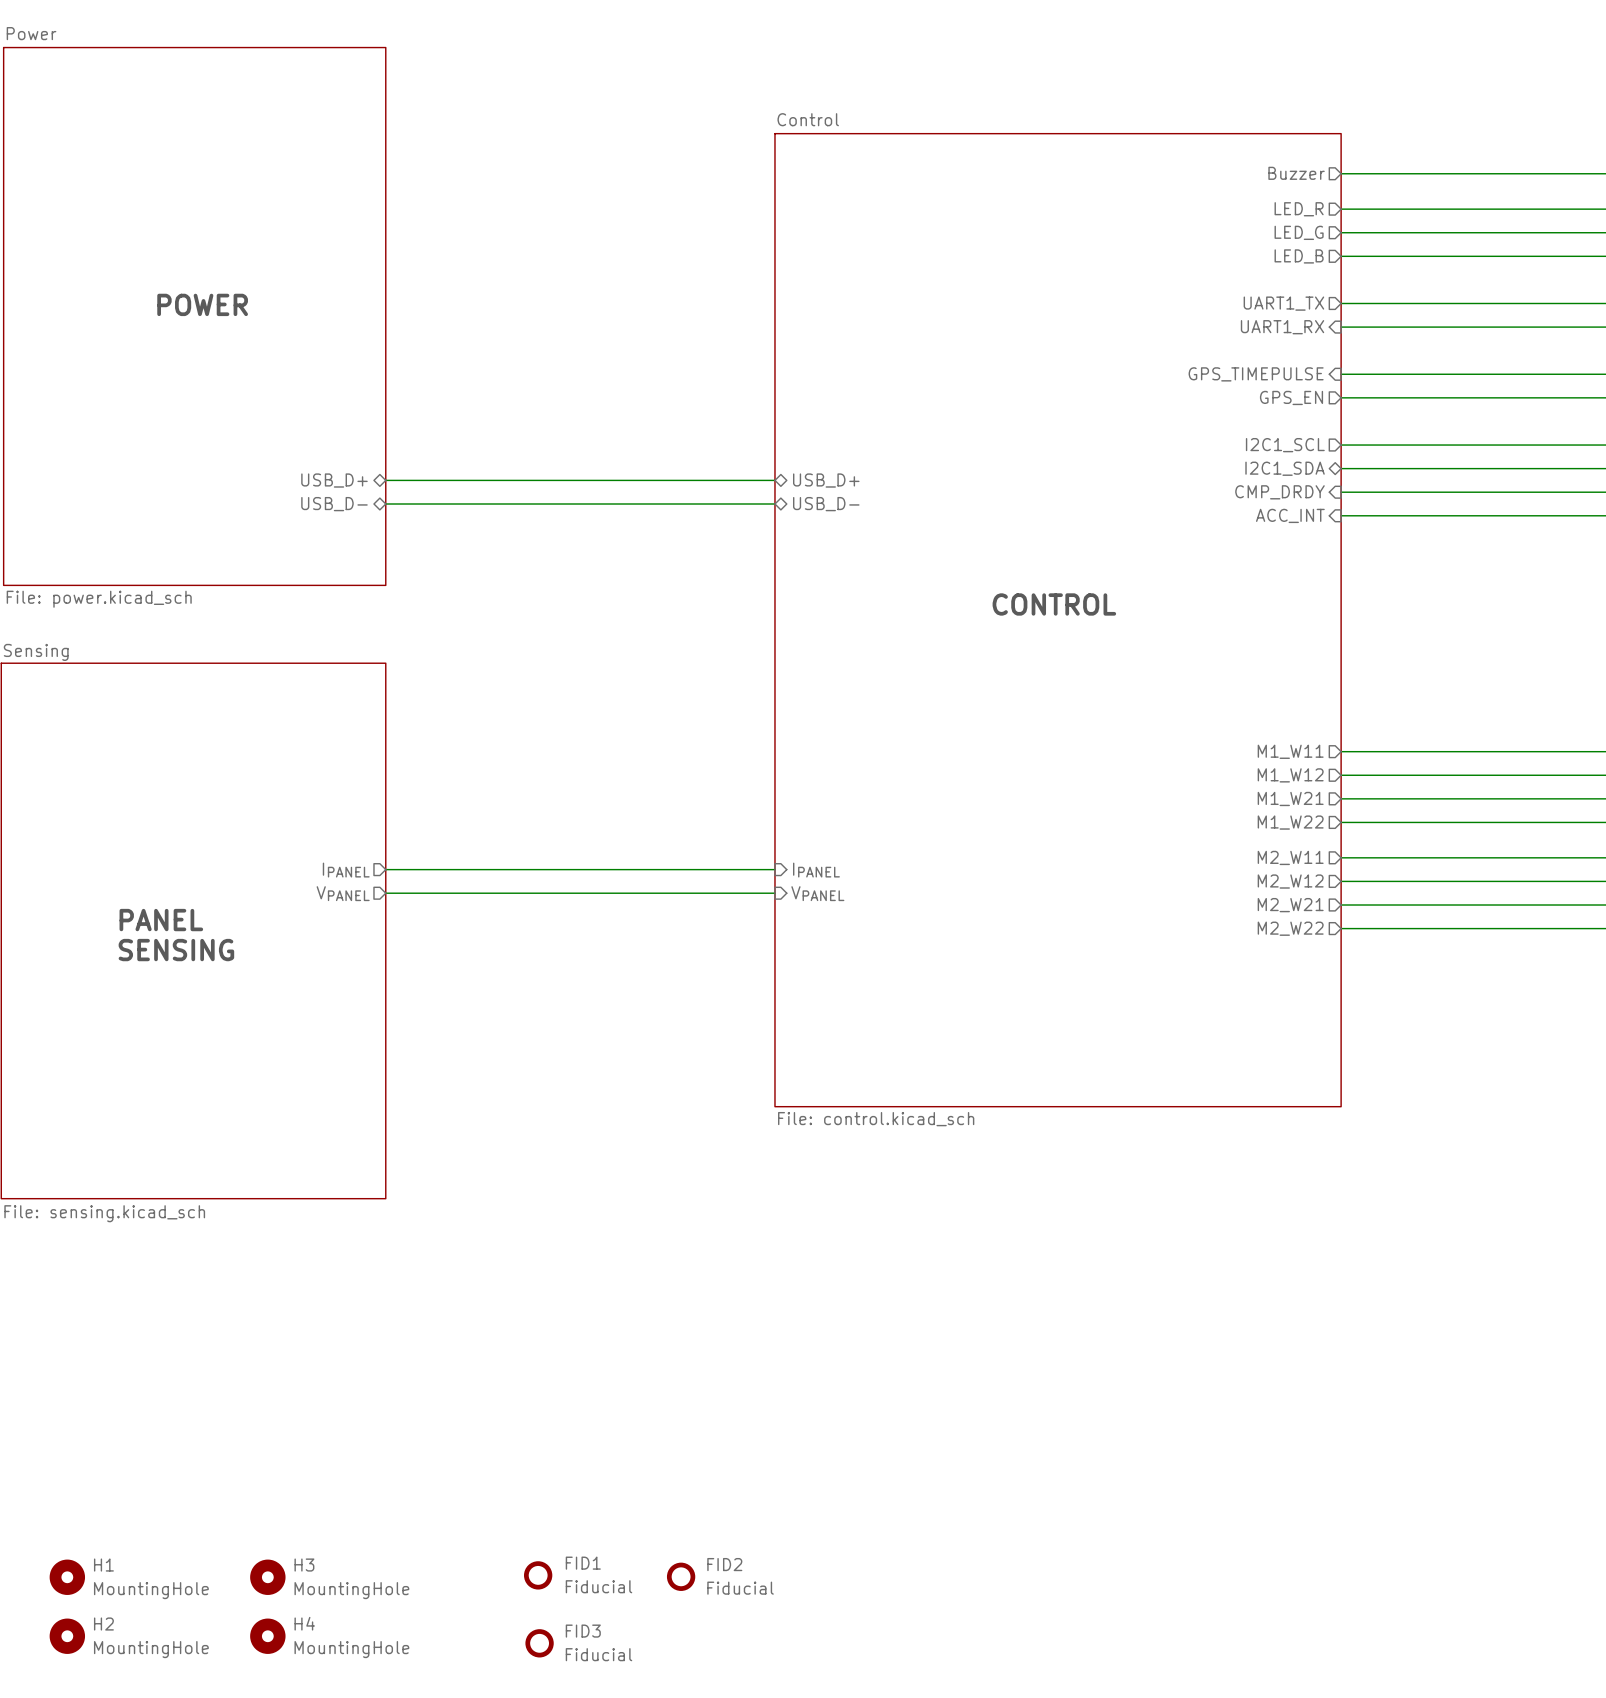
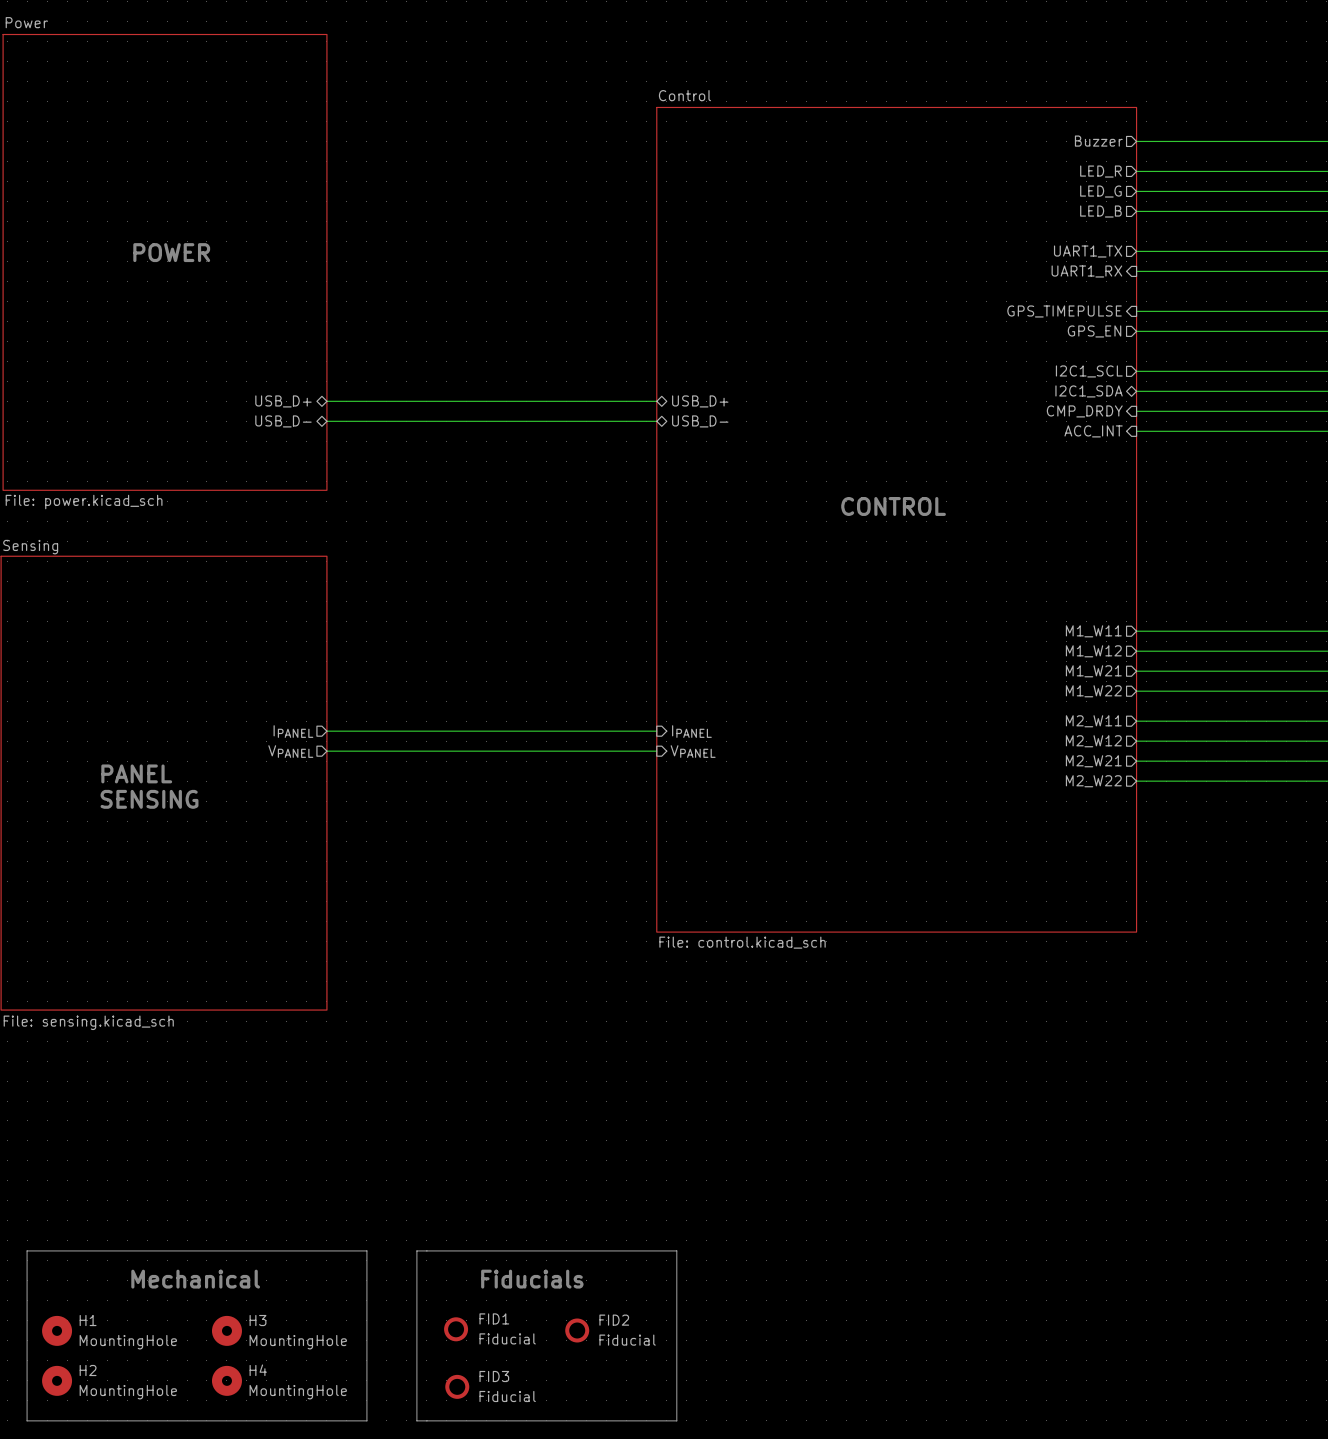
line: none -> (27, 1250) (27, 1420) (366, 1420) (366, 1250) (27, 1250)
line: none -> (416, 1250) (416, 1420) (676, 1420) (676, 1250) (416, 1250)
text: none -> Mechanical (195, 1279)
text: none -> Fiducials (532, 1279)

